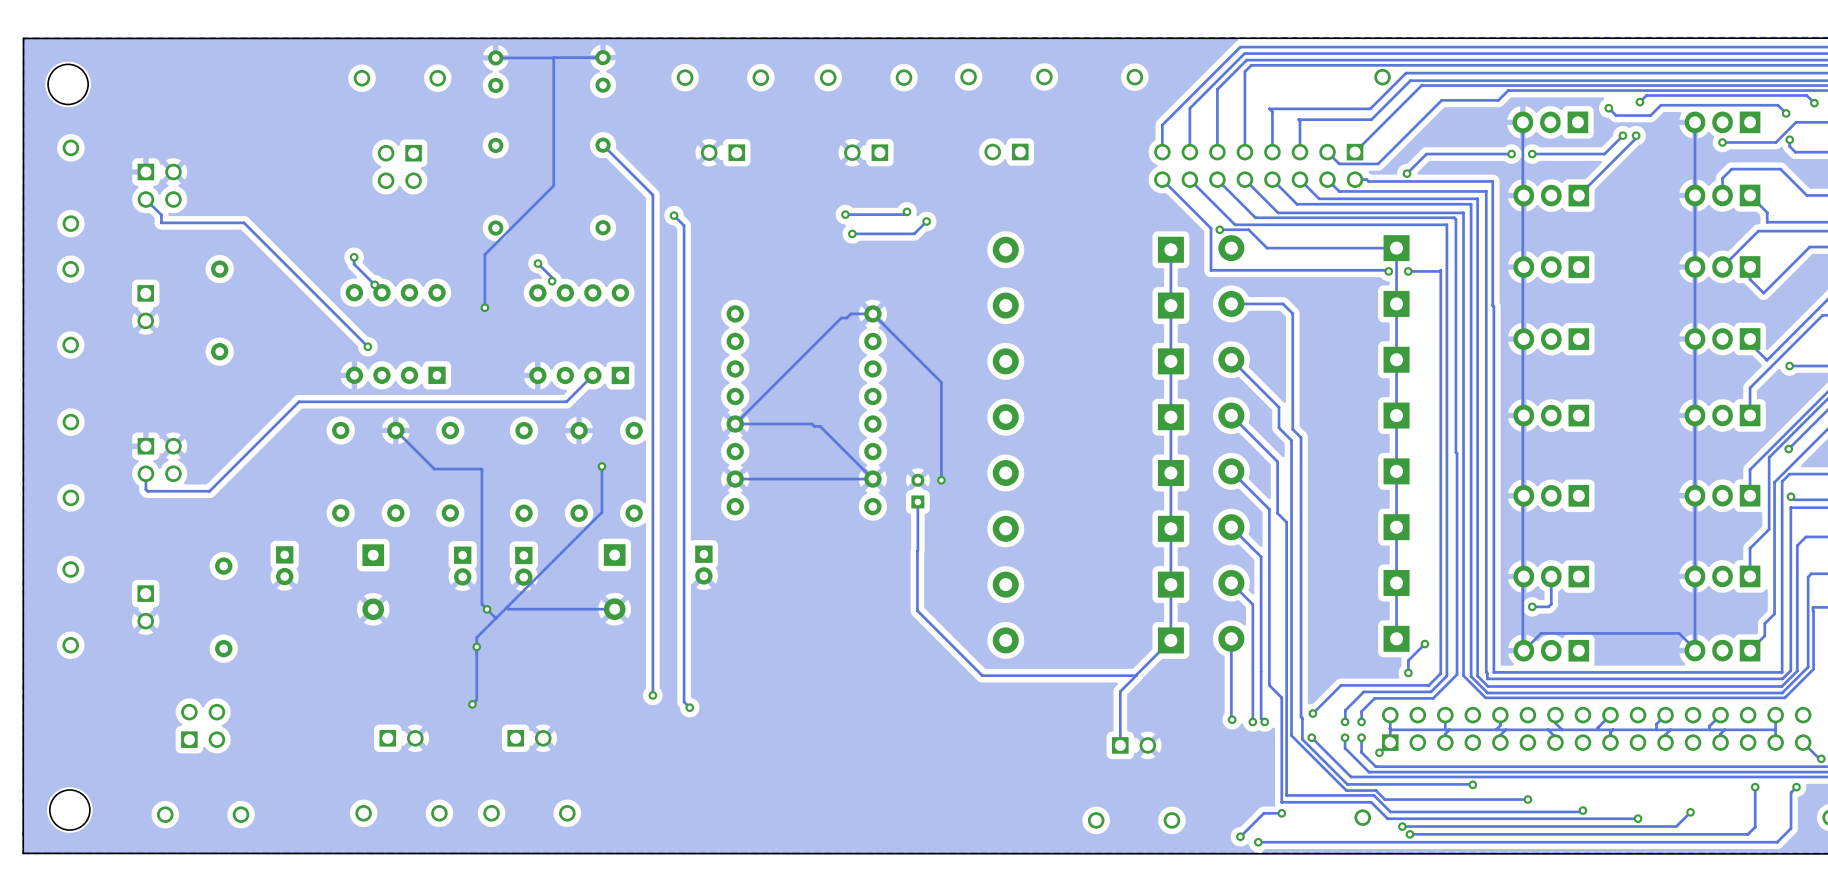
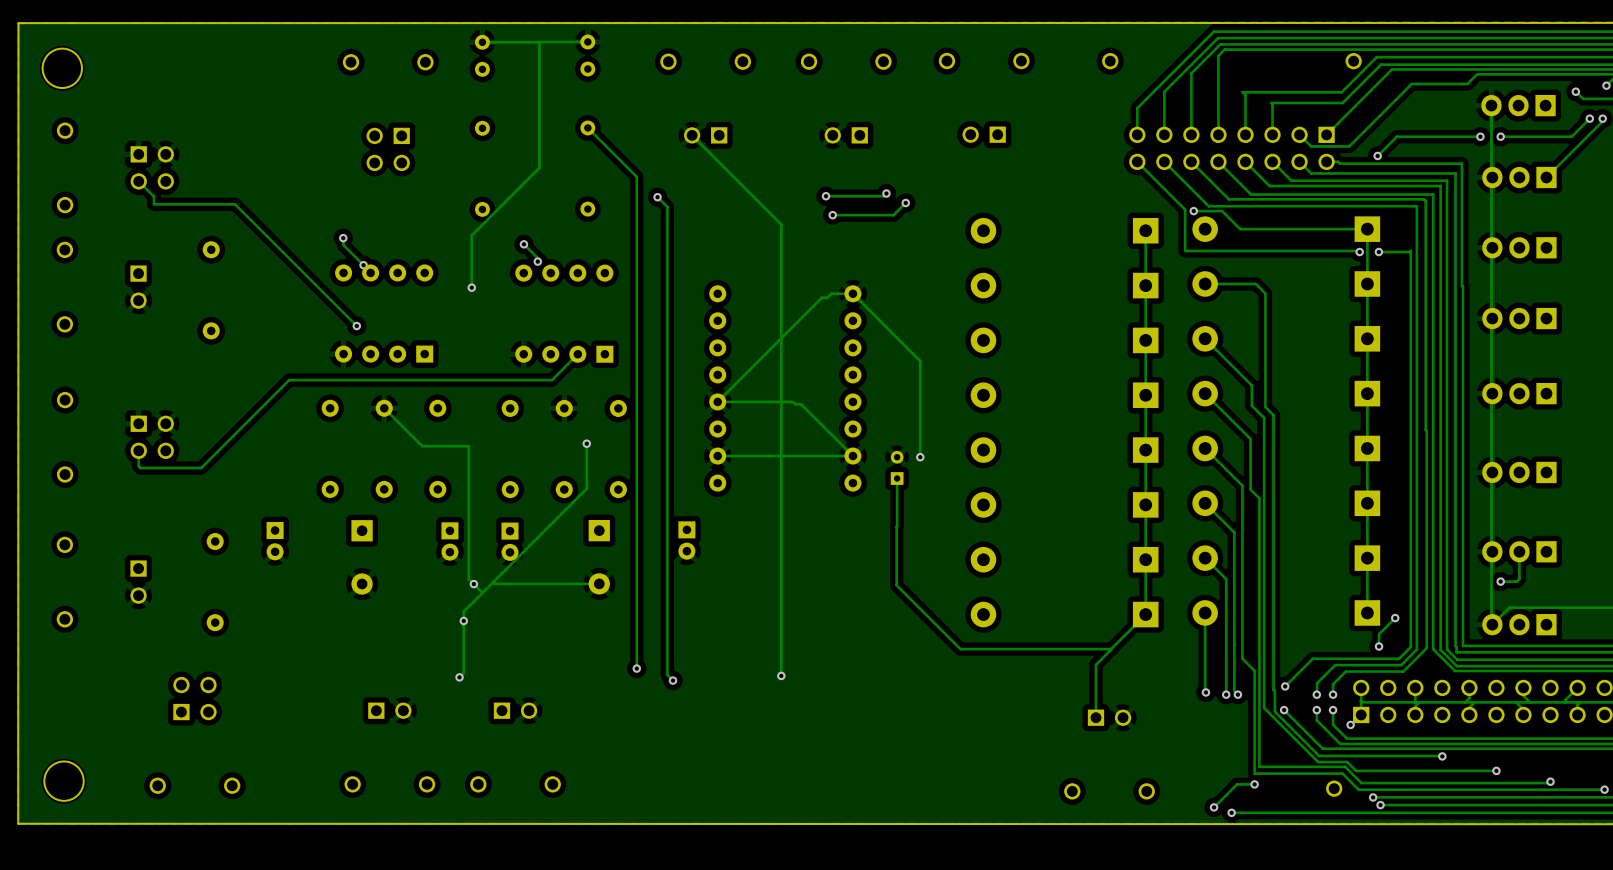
track: none -> (692, 135) (781, 224) (781, 675)
via: none -> (781, 675)

